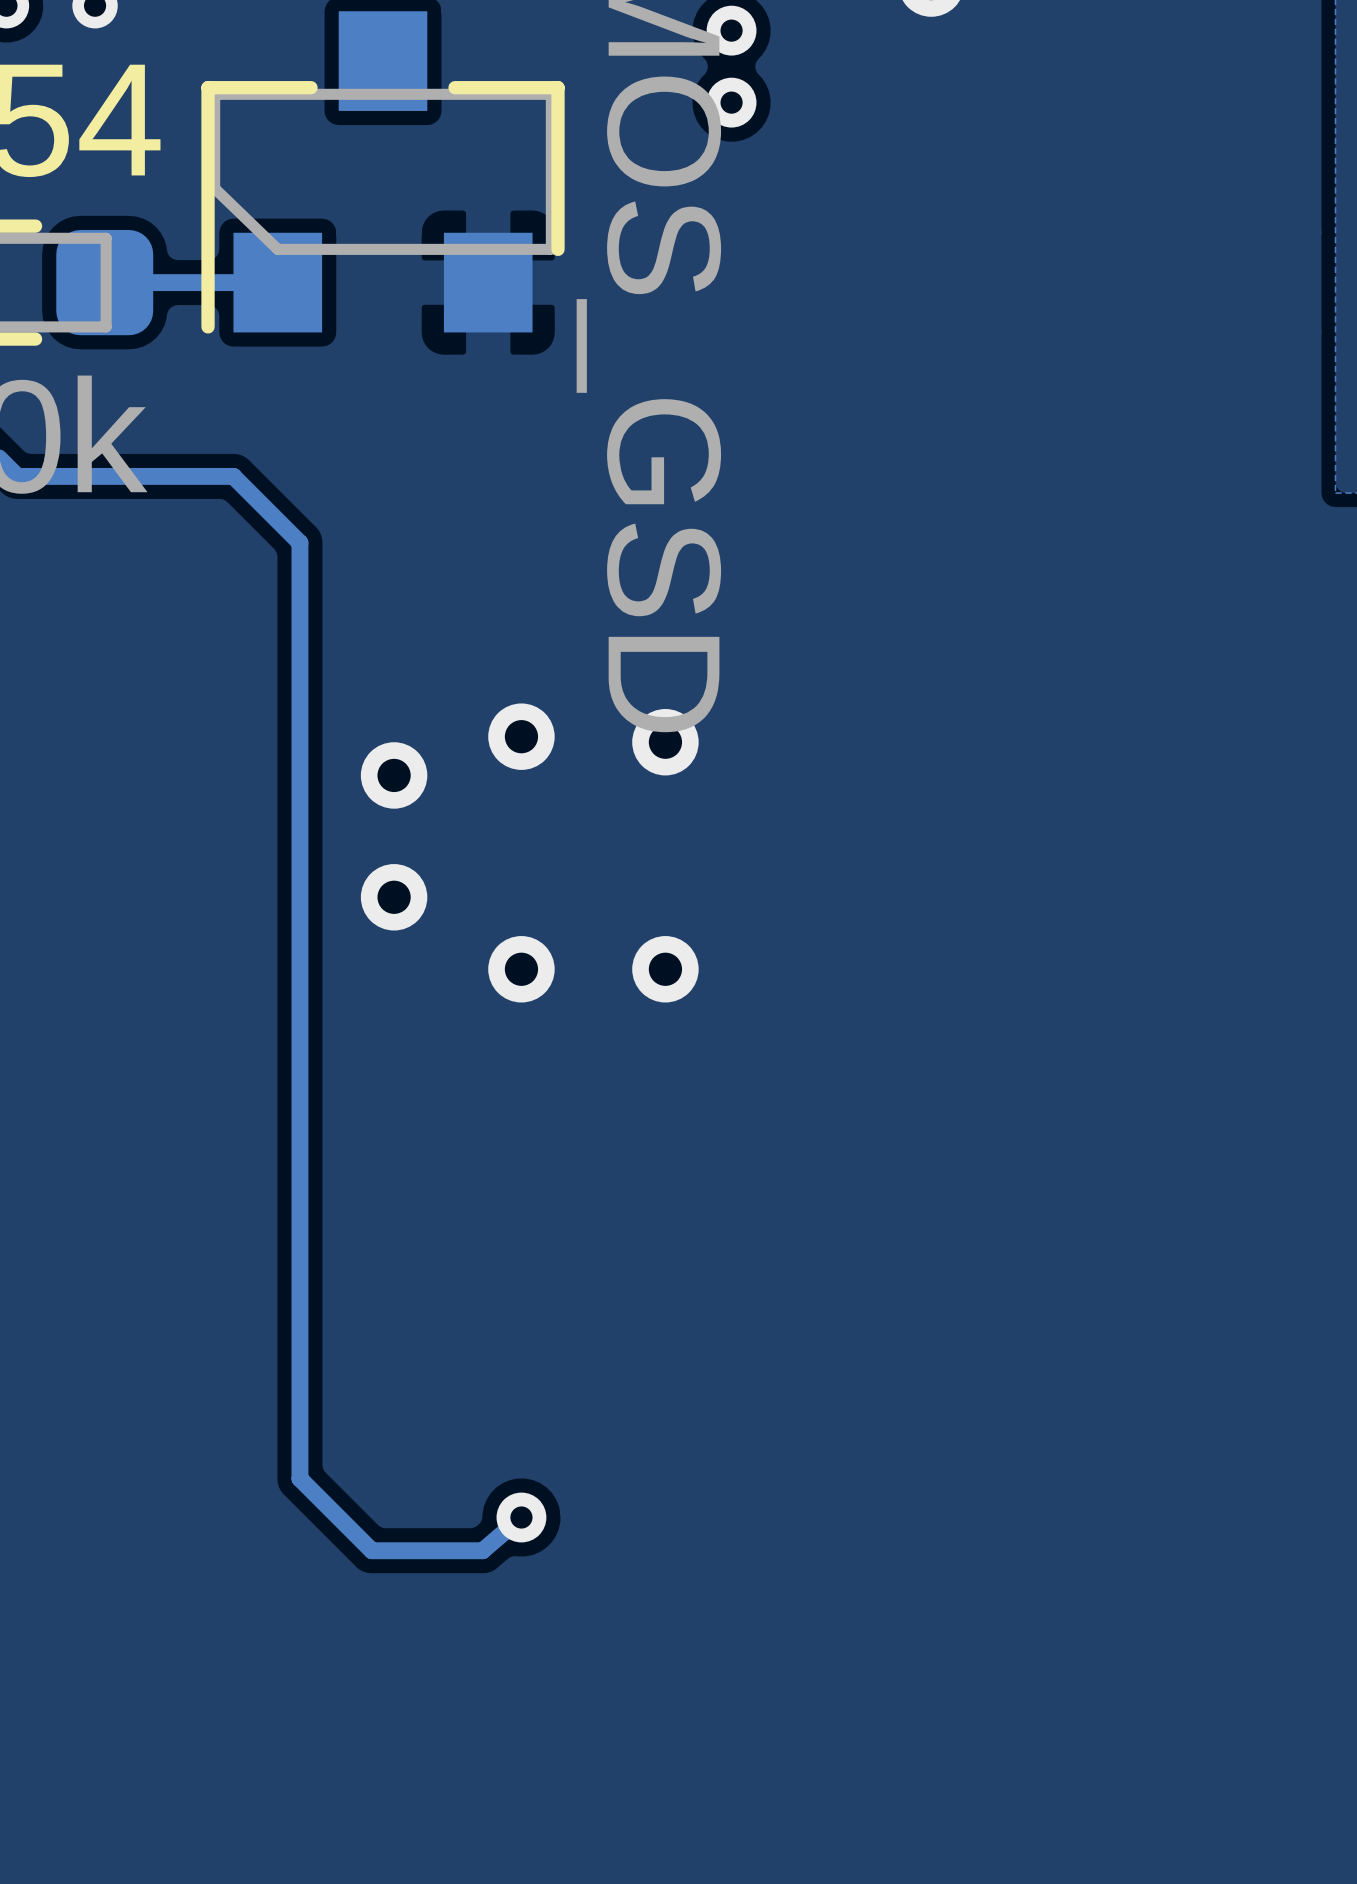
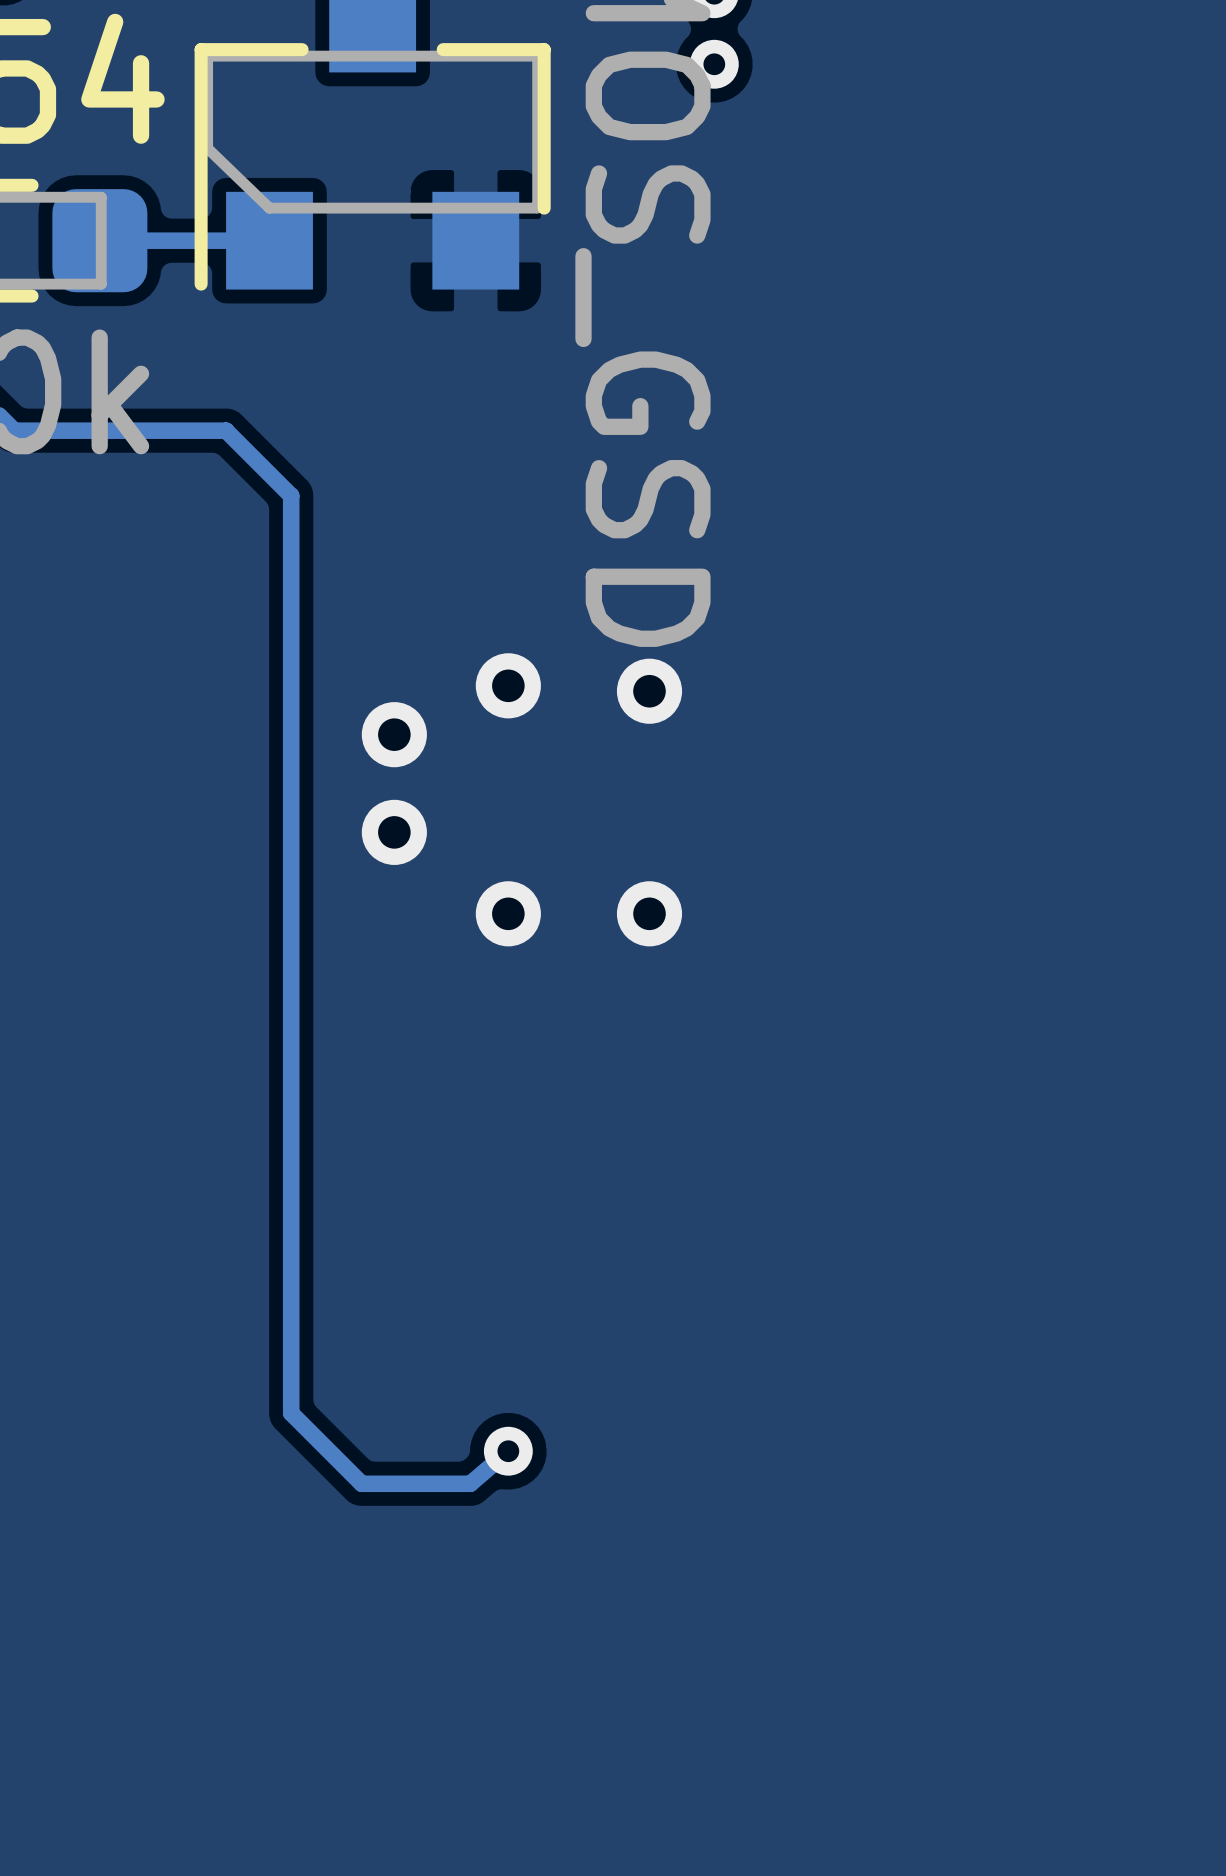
via position: (394, 775) -> (394, 734)
via position: (394, 897) -> (394, 832)

